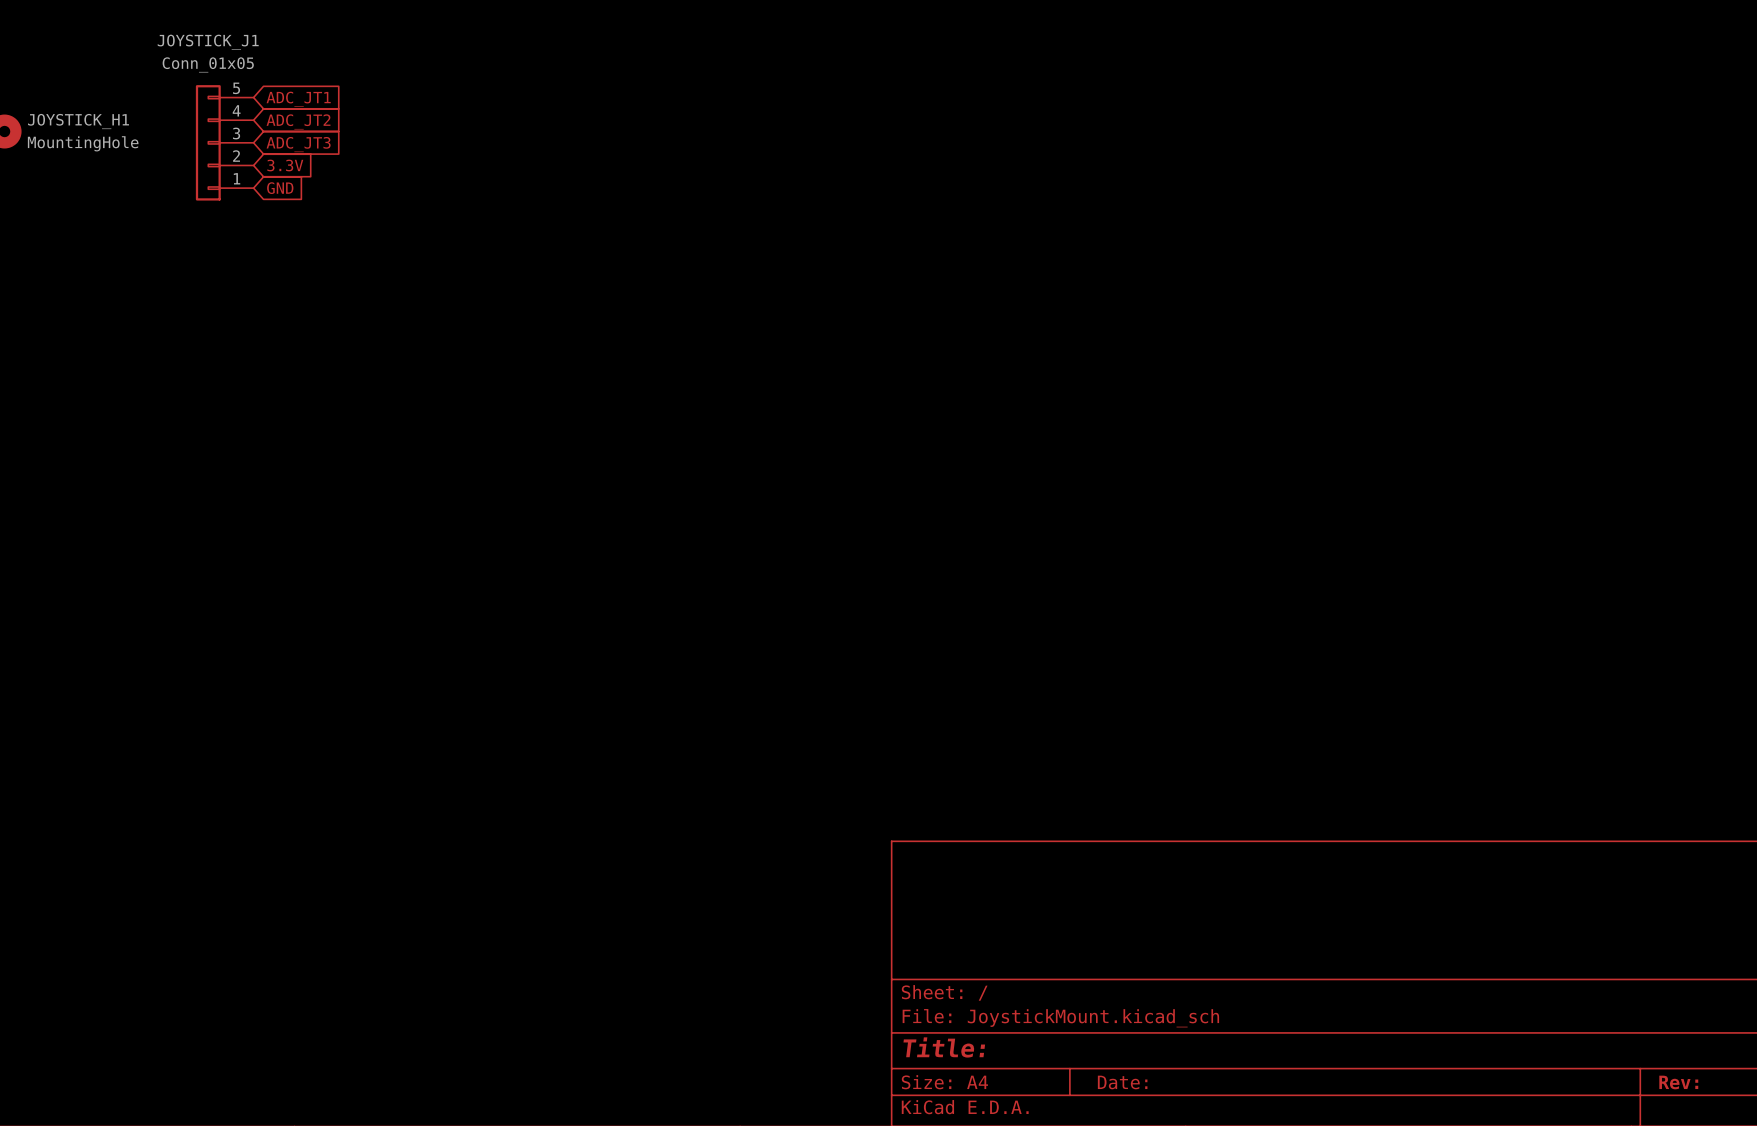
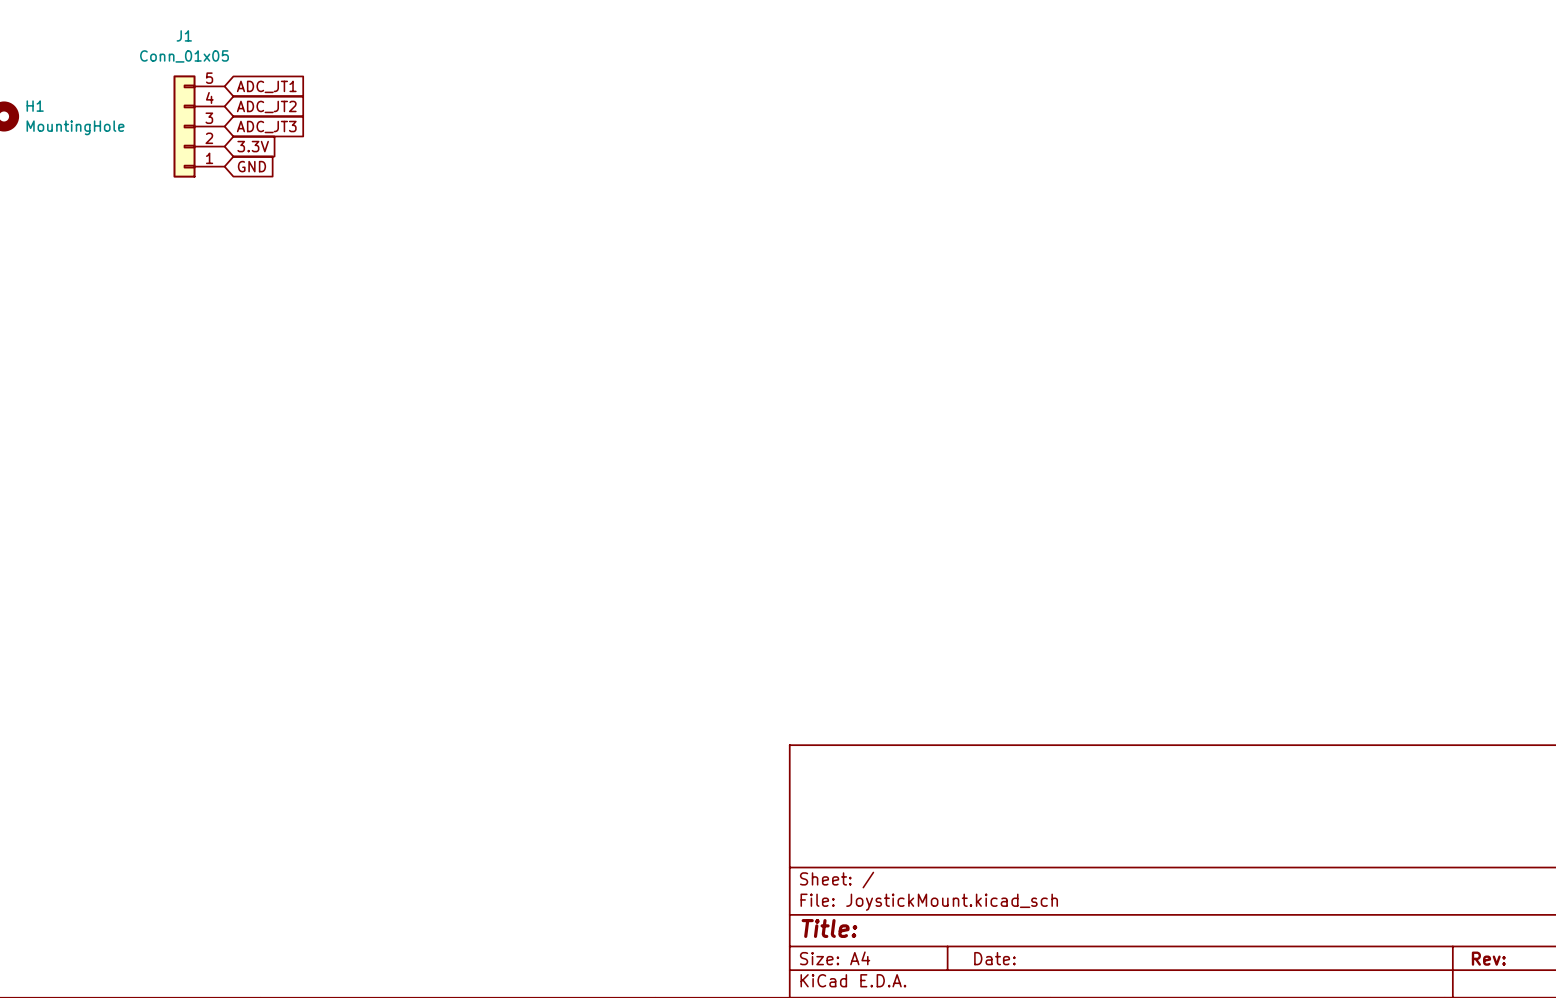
JOYSTICK_J1 name: JOYSTICK_J1 (208, 42) -> J1 (184, 35)
JOYSTICK_H1 name: JOYSTICK_H1 (78, 121) -> H1 (35, 106)

